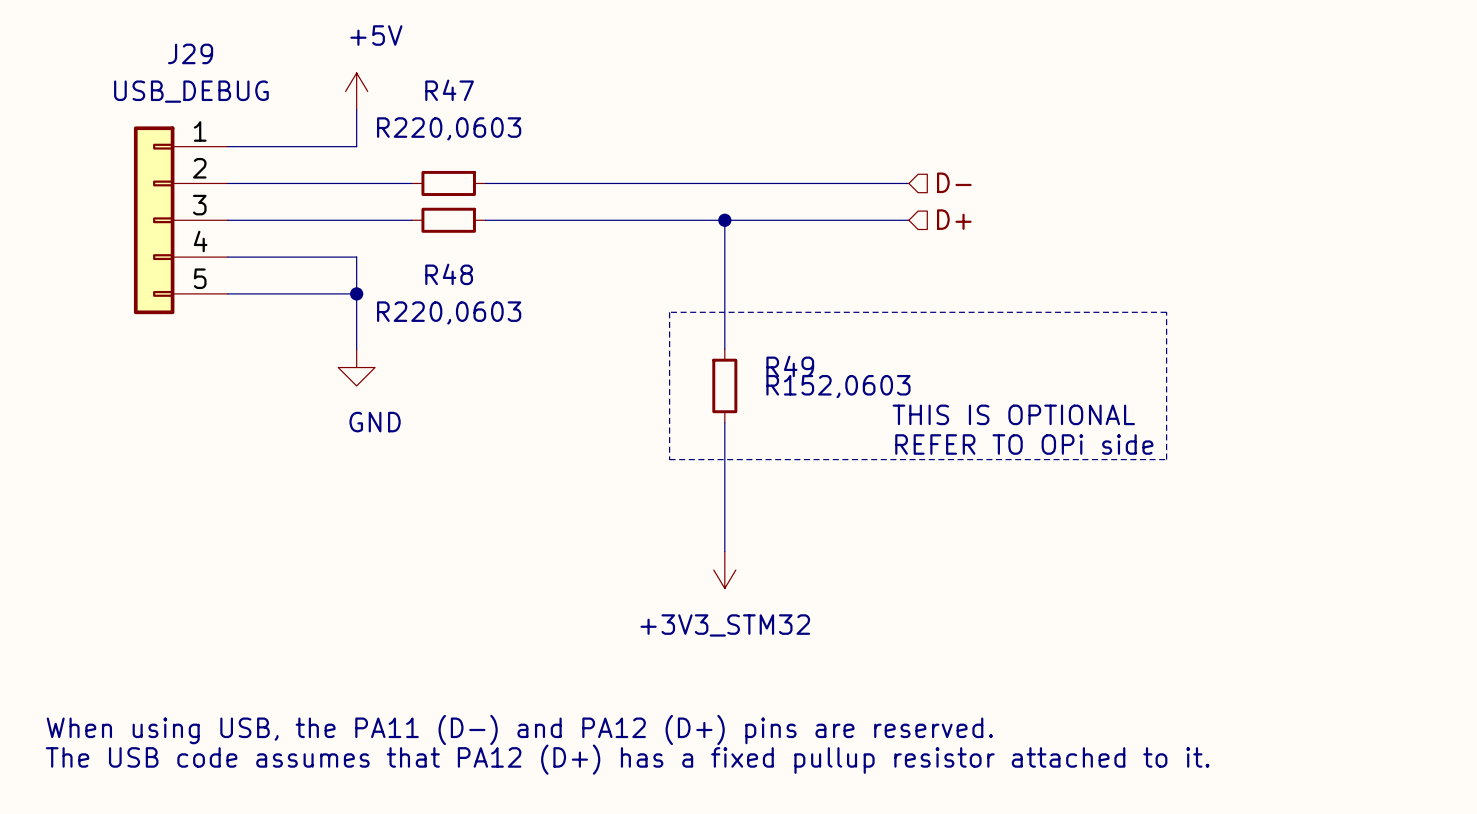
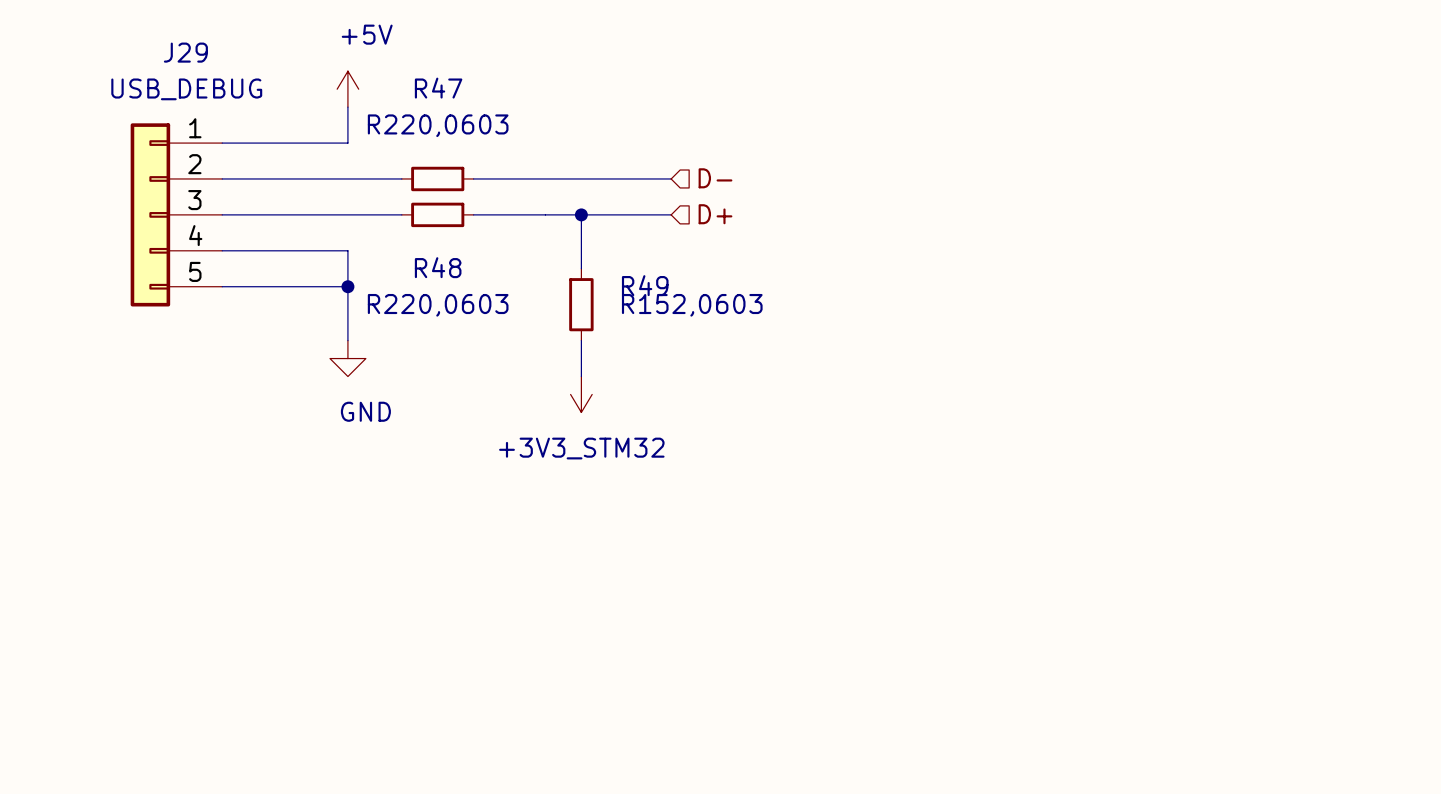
hierarchical label position: D- (954, 182) -> D- (715, 178)
wire: (688, 183) (908, 183) -> none
hierarchical label position: D+ (954, 219) -> D+ (715, 214)
wire: none -> (581, 214) (581, 268)
junction: none -> (581, 214)
wire: (688, 220) (908, 220) -> none
wire: (724, 220) (724, 349) -> none
junction: (724, 220) -> none
line: (669, 312) (669, 459) (1166, 459) (1166, 312) (669, 312) -> none
wire: none -> (581, 340) (581, 376)
R49 position: (724, 385) -> (581, 304)
text: THIS IS OPTIONAL (1013, 414) -> none
wire: (724, 422) (724, 551) -> none
text: REFER TO OPi side (1024, 444) -> none
power symbol position: +3V3_STM32 (724, 570) -> +3V3_STM32 (581, 394)
text: When using USB, the PA11 (D-) and PA12 (D+) pins are reserved. (519, 729) -> none
text: The USB code assumes that PA12 (D+) has a fixed pullup resistor attached to it. (627, 759) -> none

